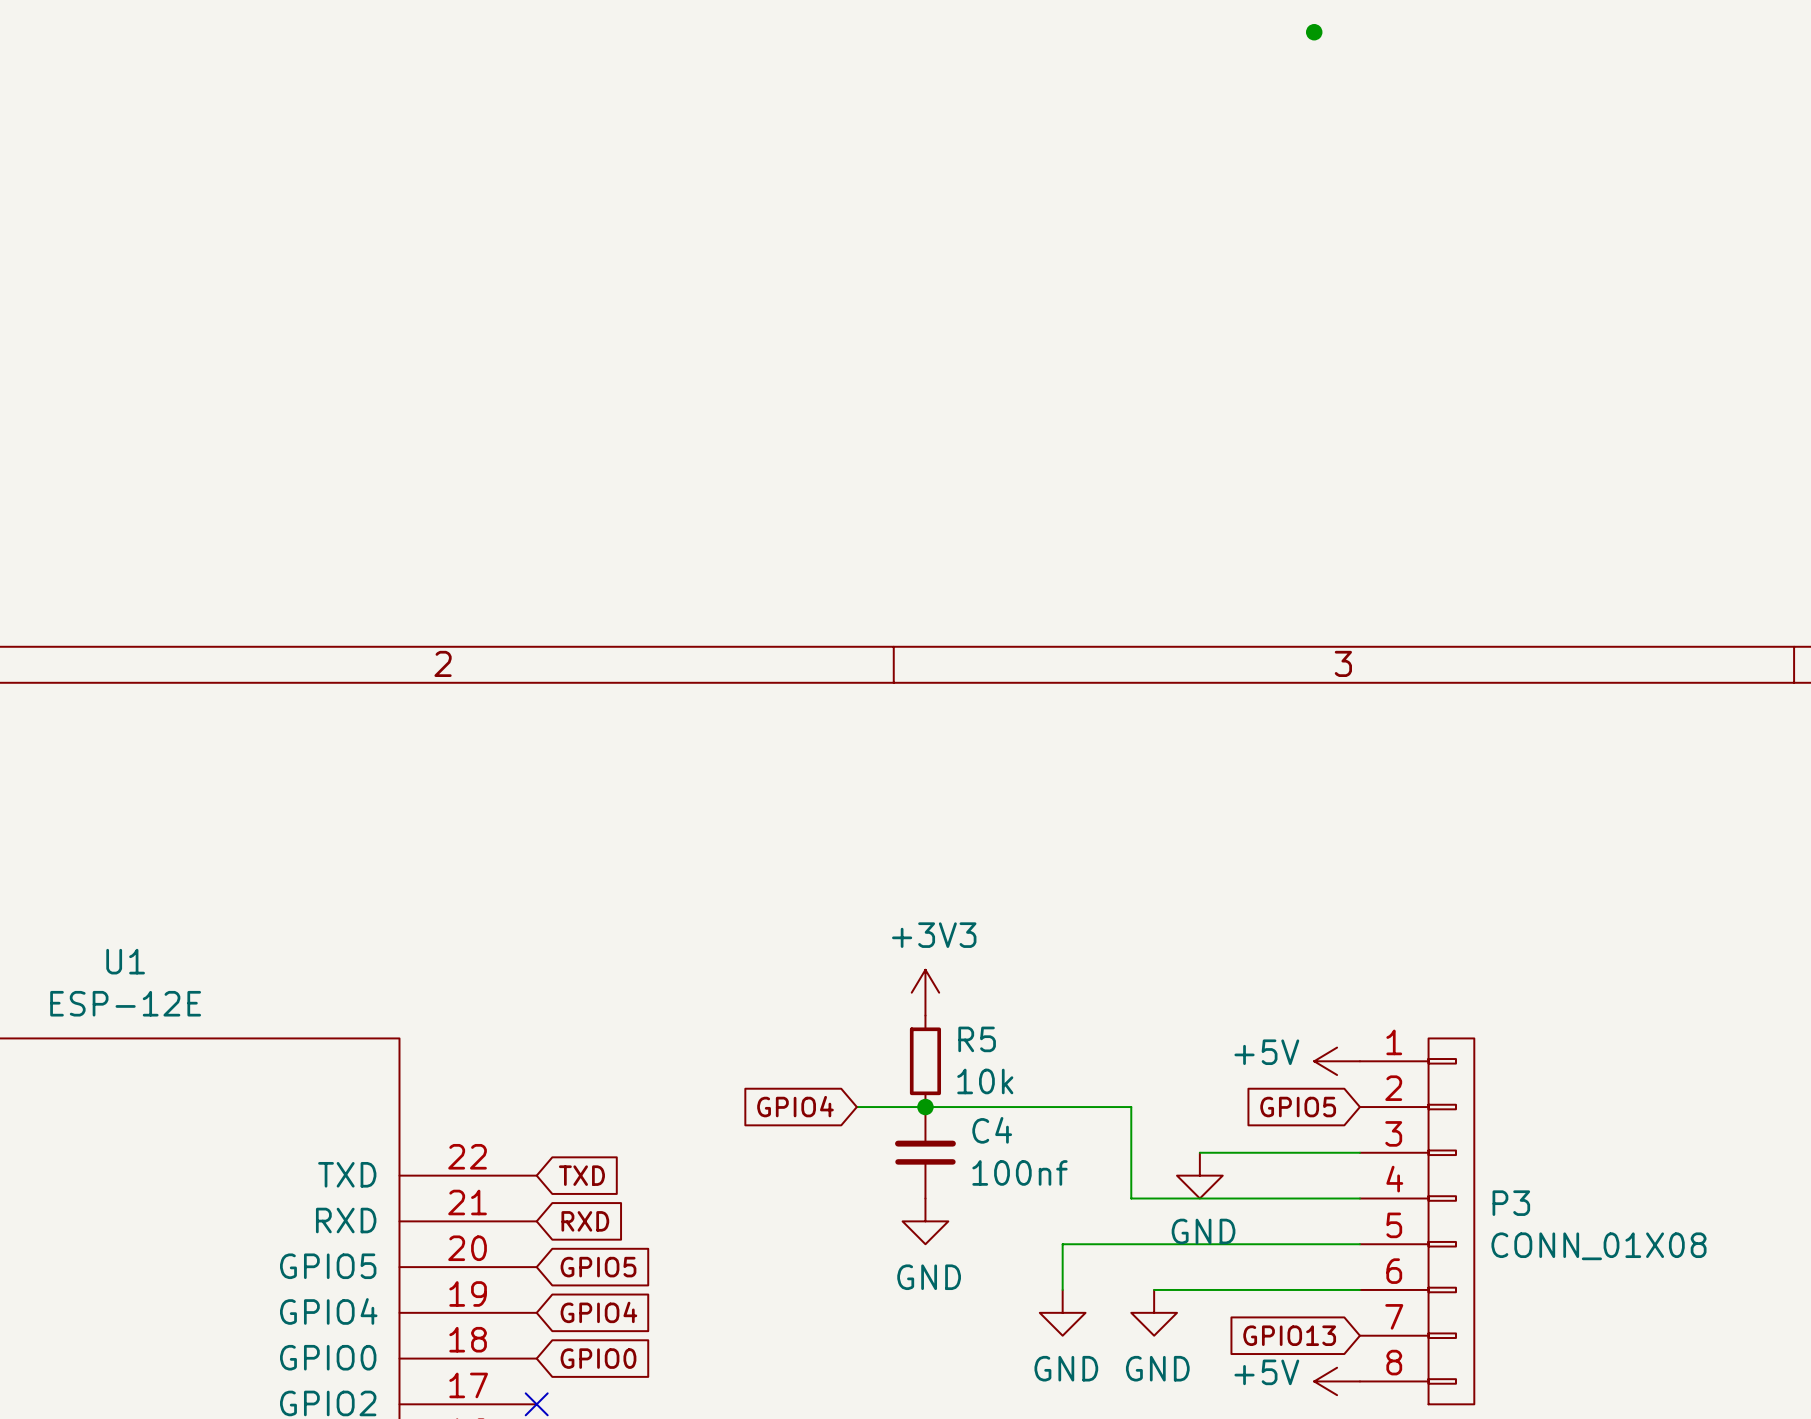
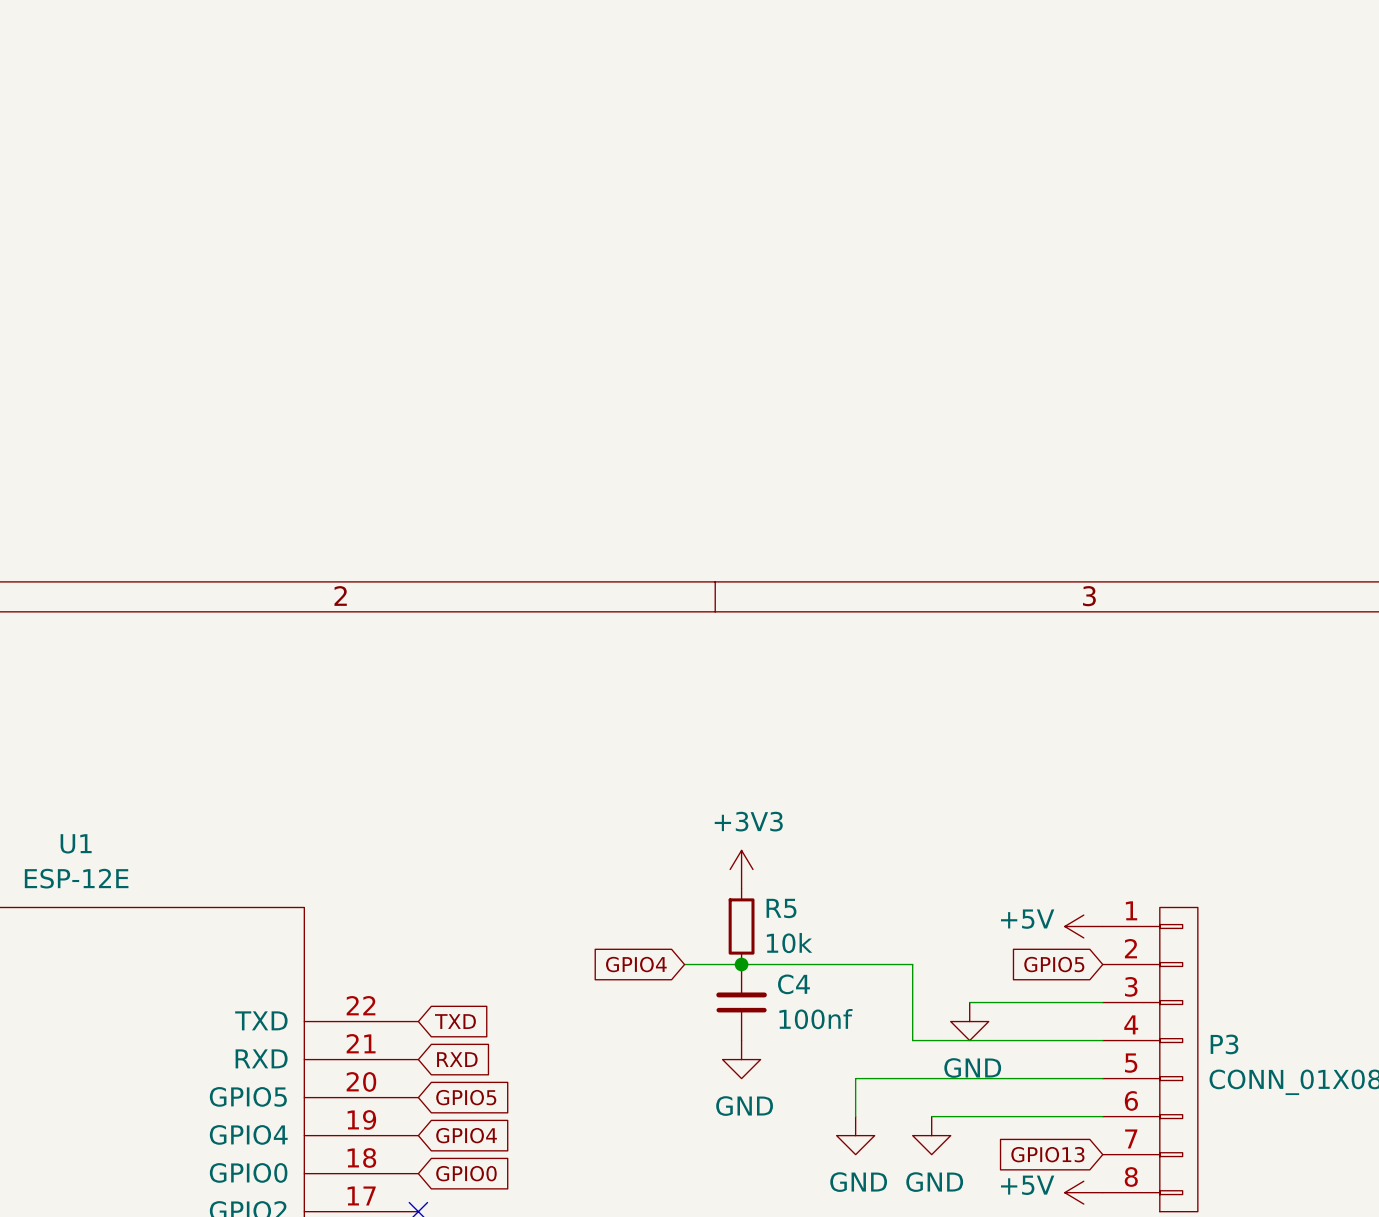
junction: (1314, 32) -> none

